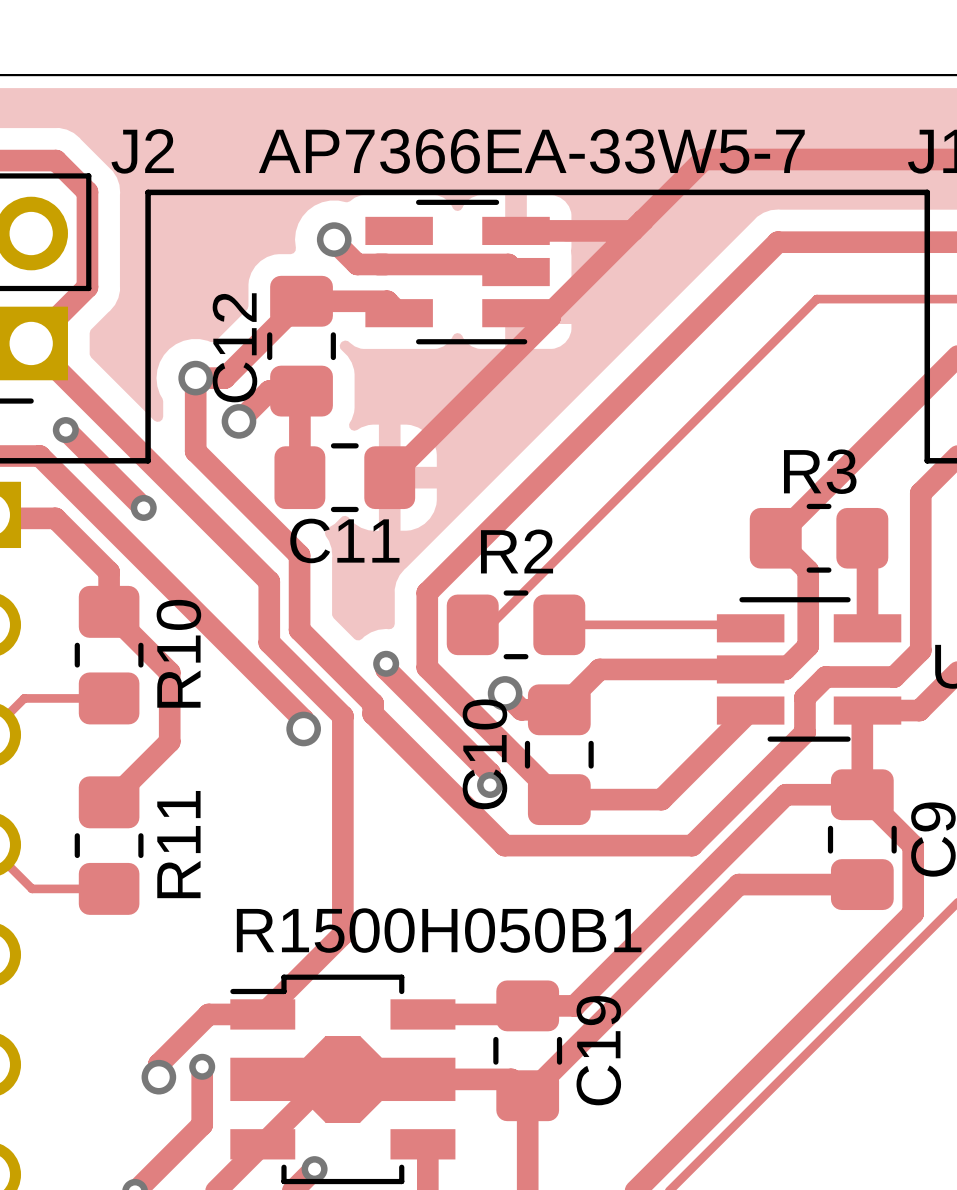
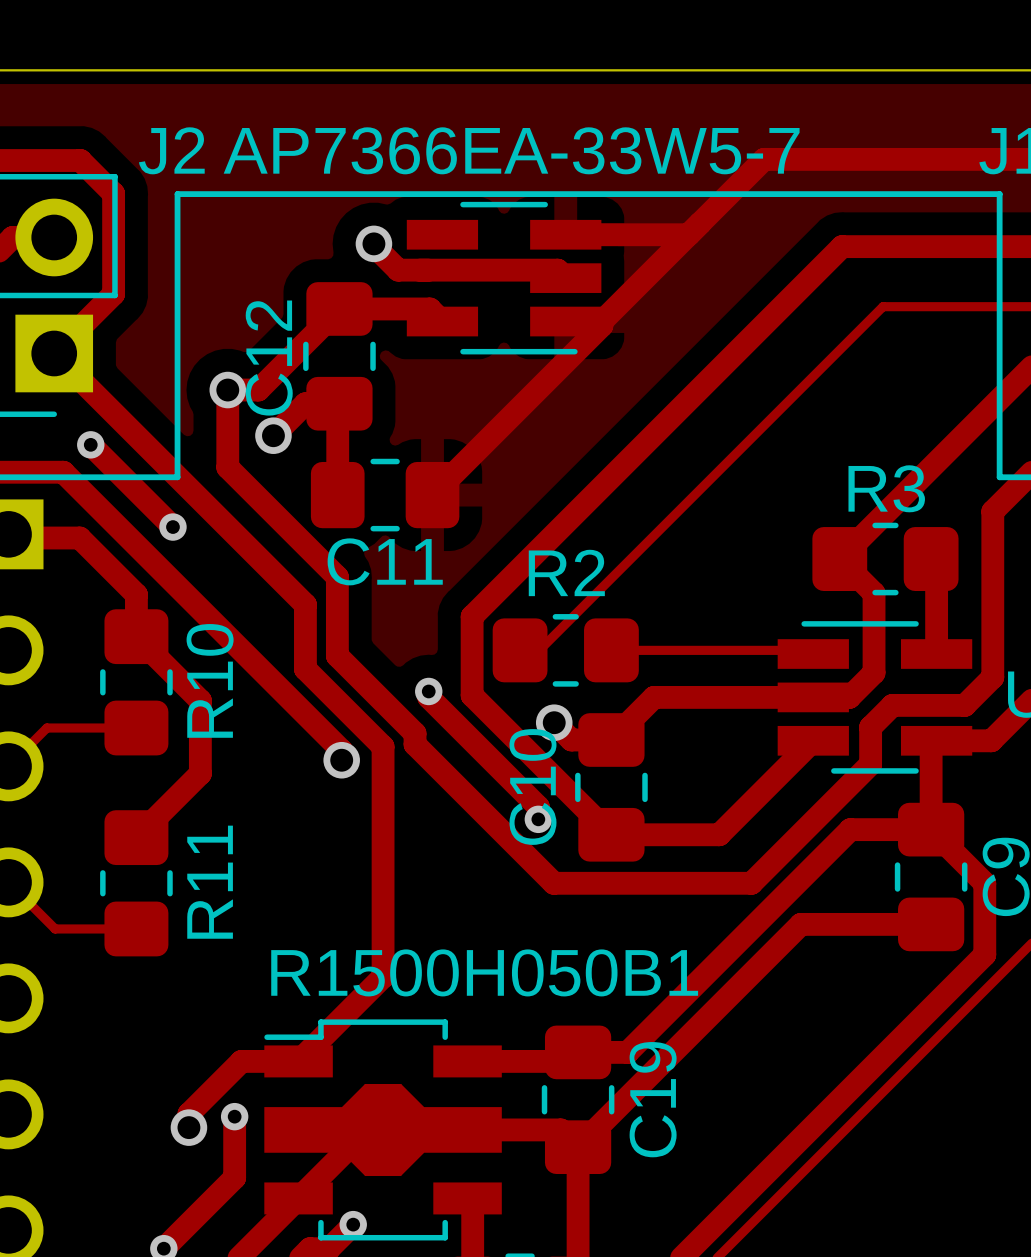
AP7366EA-33W5-7 name position: AP7366EA-33W5-7 (531, 151) -> AP7366EA-33W5-7 (511, 150)

